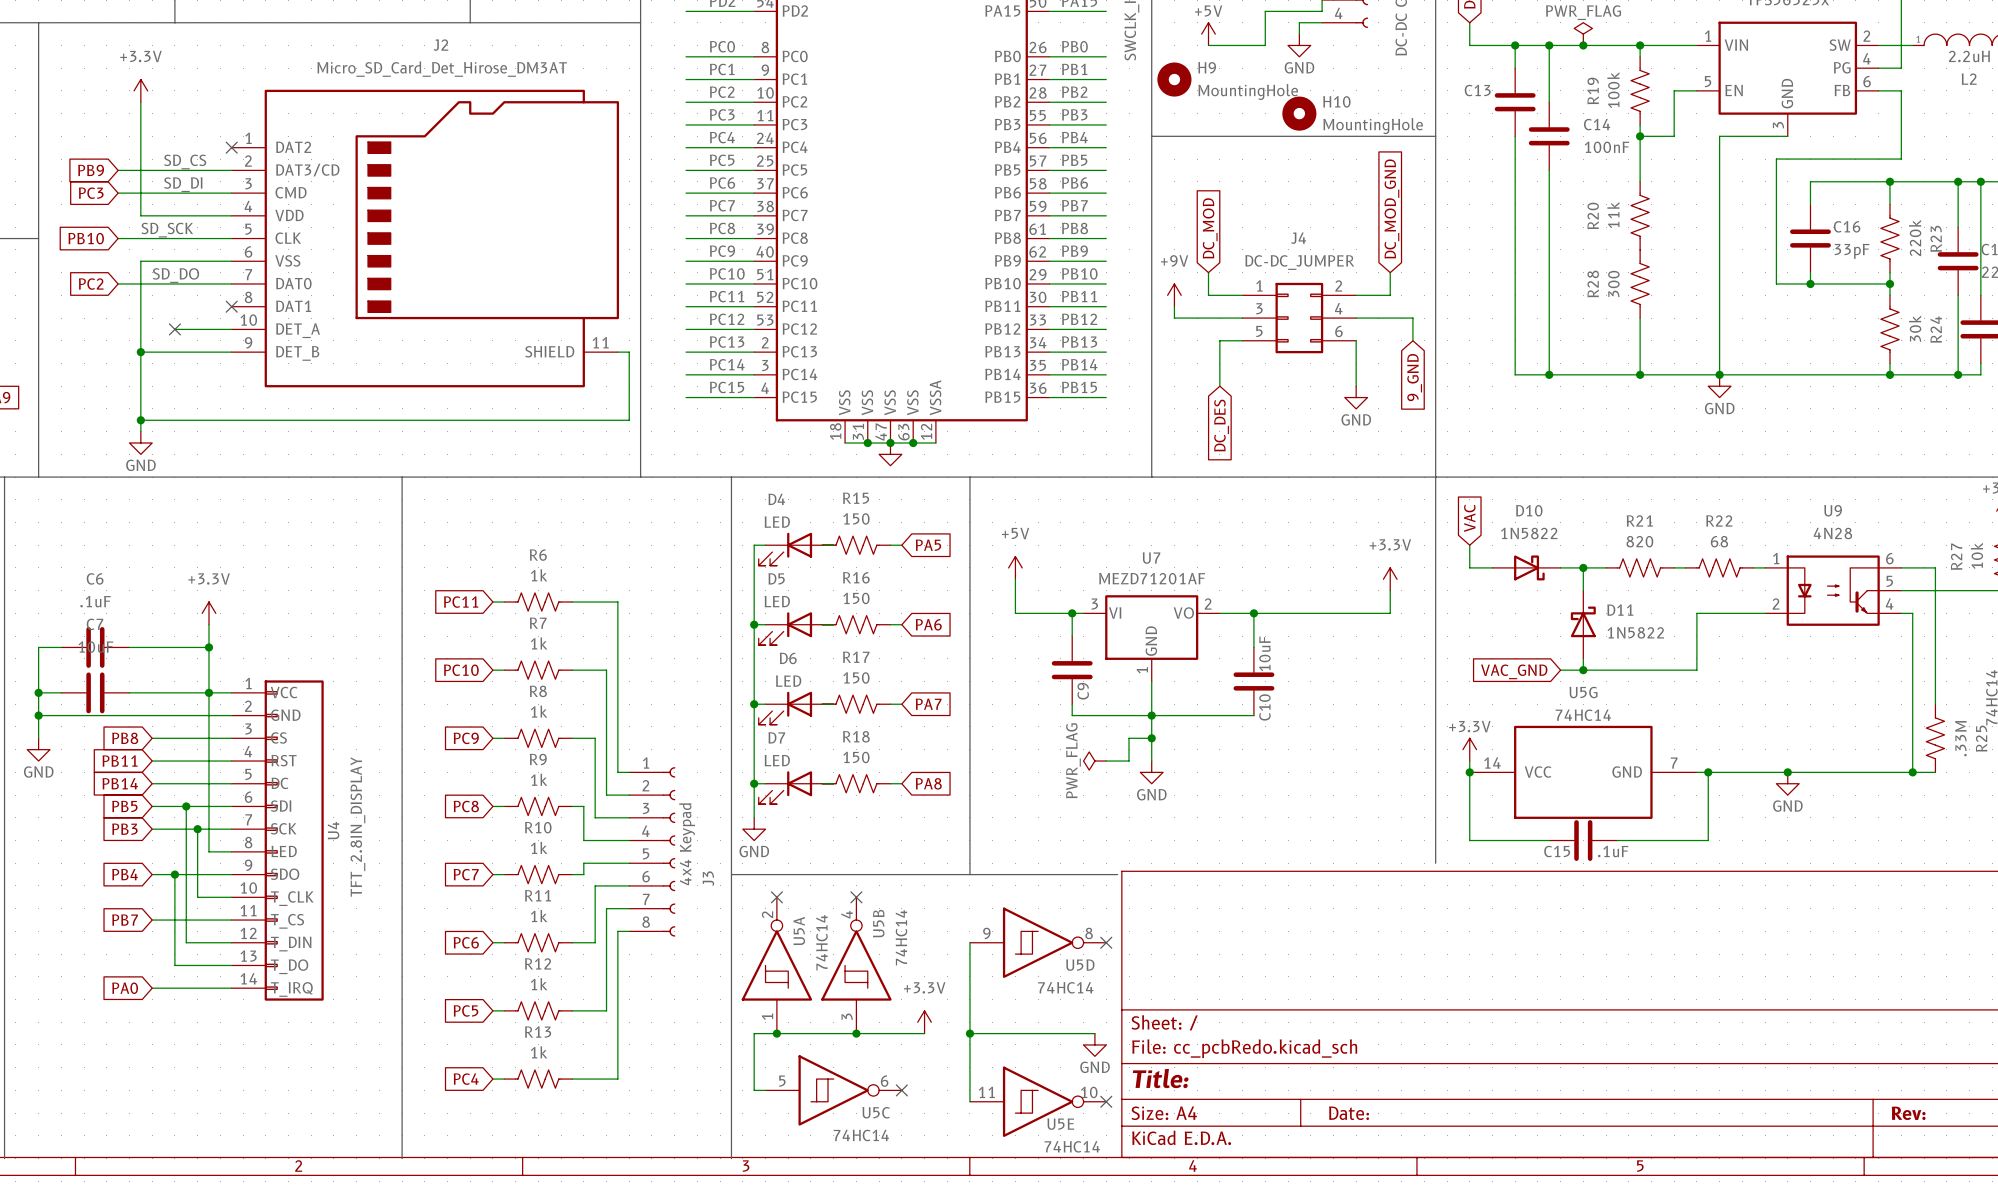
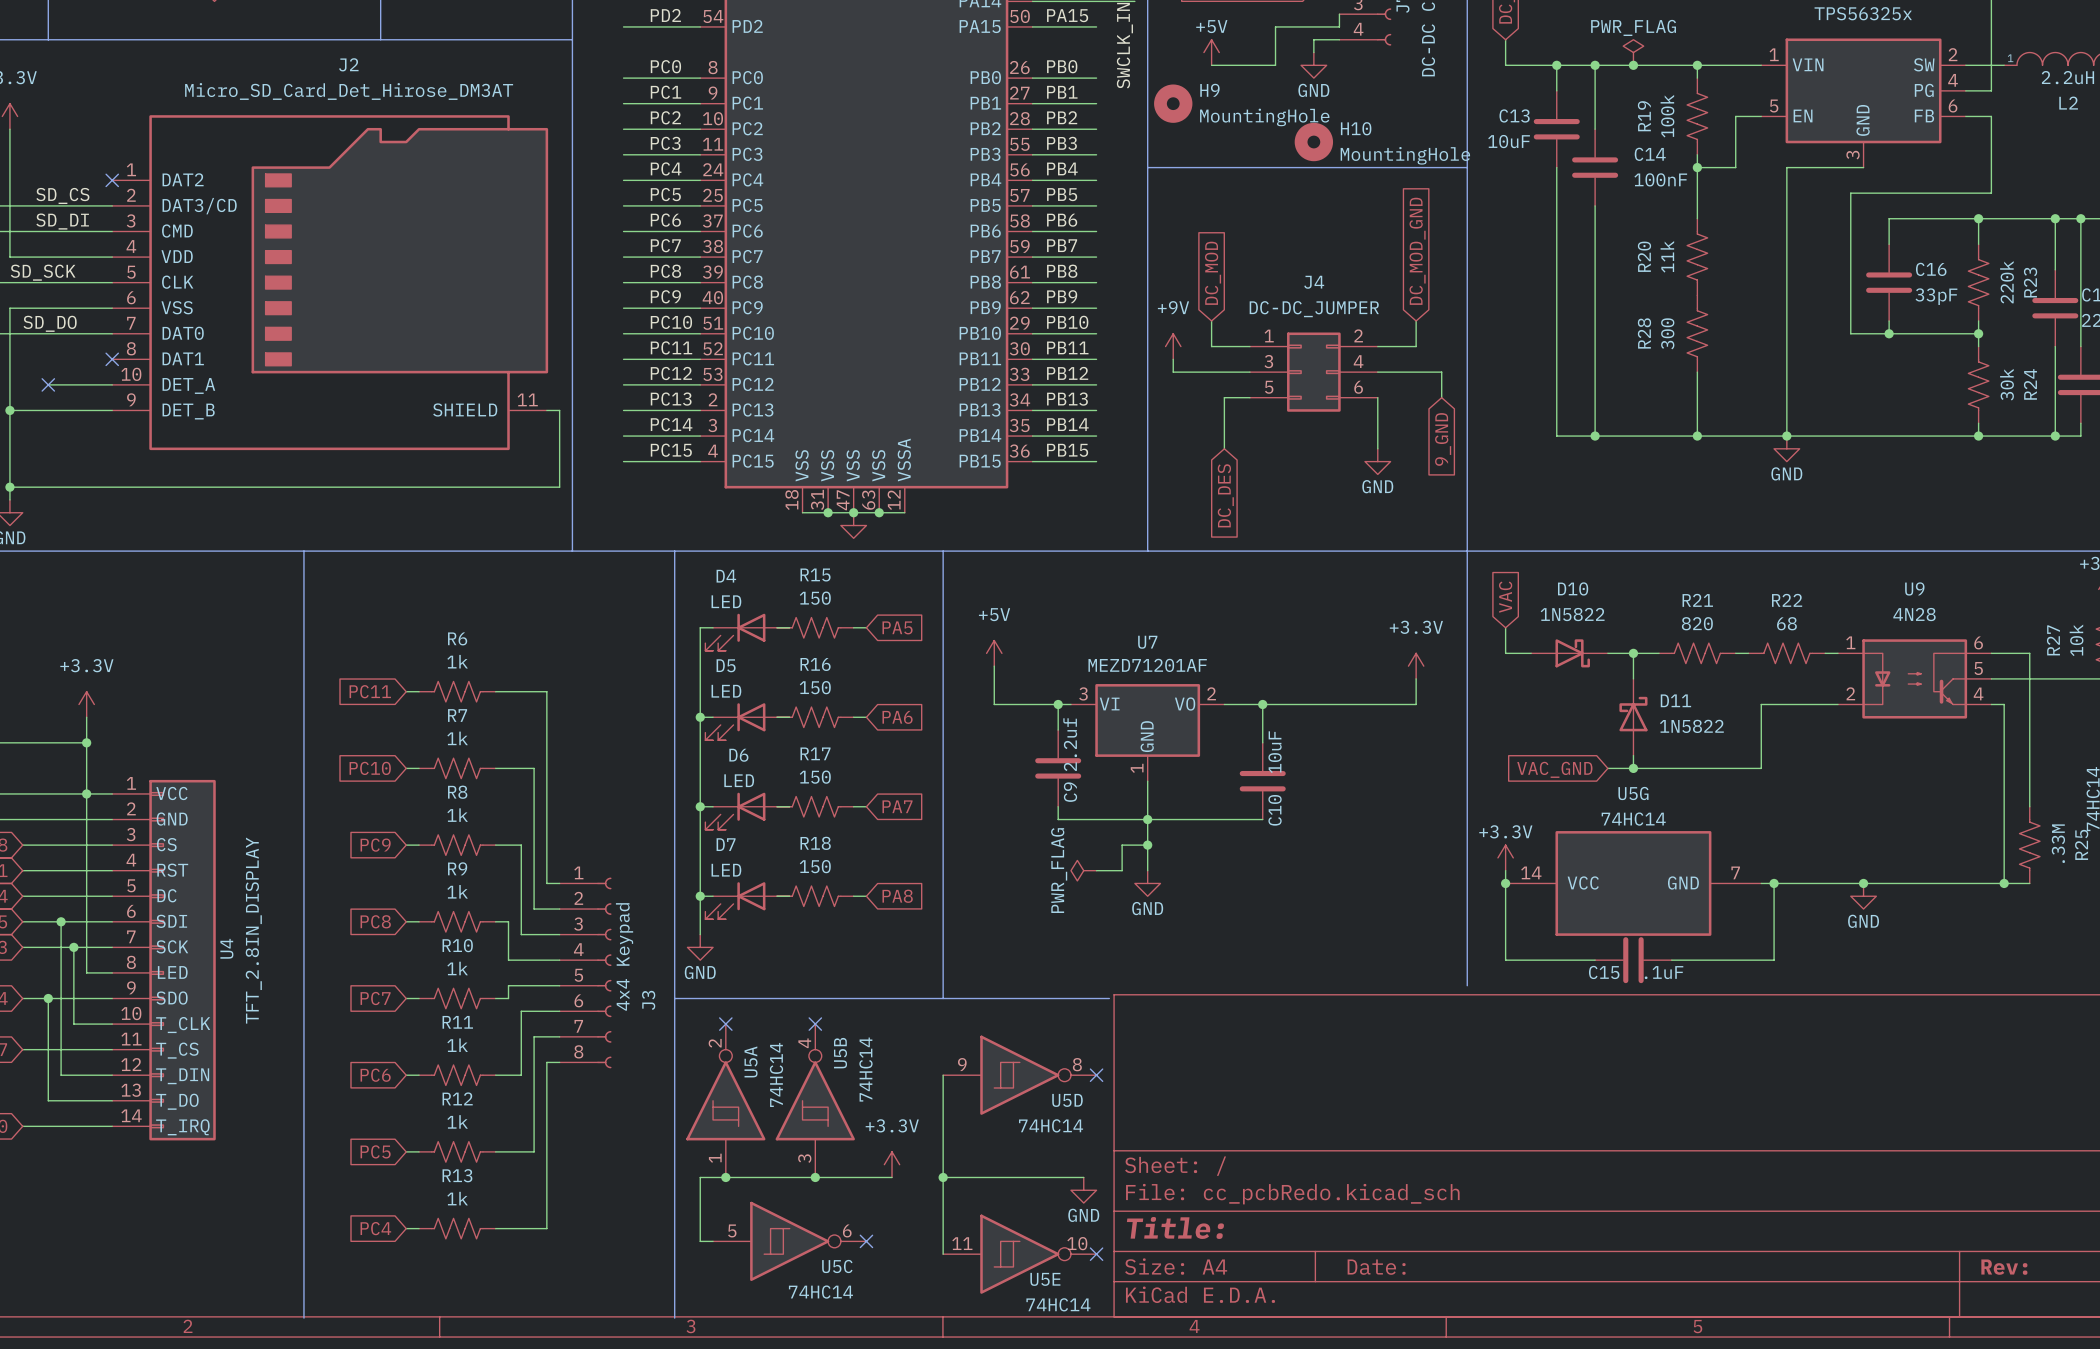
C13 value: none -> 10uF (1509, 141)
C9 value: none -> 2.2uf (1070, 744)

